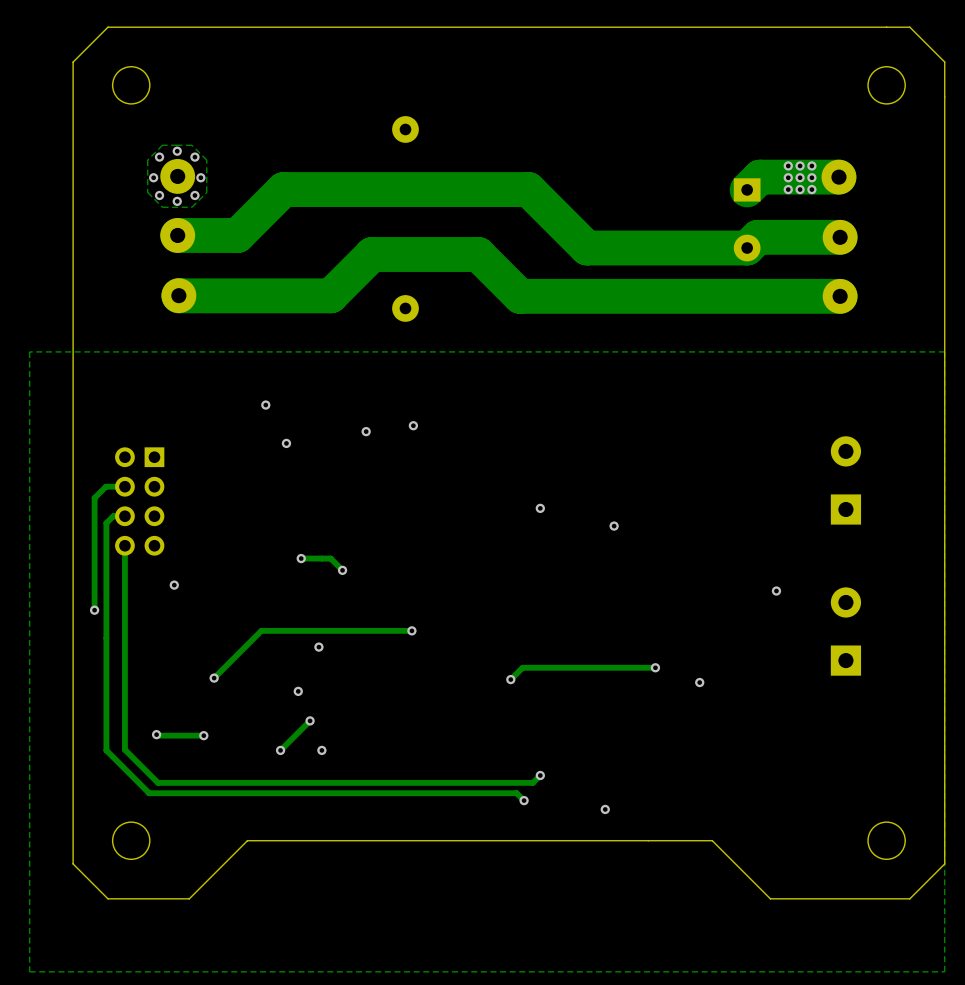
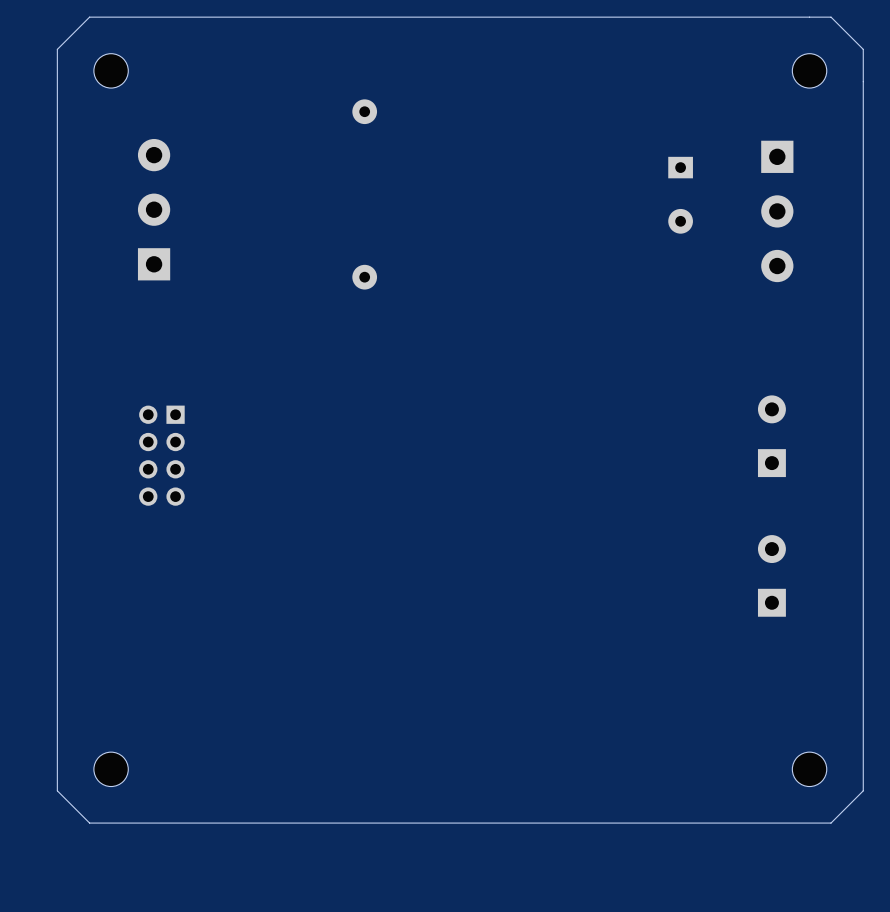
zone outline: (192, 145) (162, 145) (147, 160) (147, 192) (162, 207) (192, 207) (206, 192) (206, 160) (192, 145) -> none
via: (177, 151) -> none
via: (159, 157) -> none
via: (194, 157) -> none
part footprint: [160, 159, 197, 314] -> [137, 139, 171, 281]
via: (788, 165) -> none
via: (800, 165) -> none
via: (811, 165) -> none
via: (153, 177) -> none
via: (200, 177) -> none
via: (788, 177) -> none
via: (800, 177) -> none
via: (811, 177) -> none
track: (838, 177) (759, 177) (747, 189) -> none
via: (788, 189) -> none
via: (800, 189) -> none
via: (811, 189) -> none
via: (159, 195) -> none
via: (194, 195) -> none
via: (177, 201) -> none
track: (177, 235) (237, 235) (283, 189) (528, 189) (586, 248) (747, 248) (757, 237) (840, 237) -> none
part: (839, 236) -> none
part: none -> (777, 211)
track: (179, 295) (330, 295) (372, 254) (478, 254) (520, 296) (840, 296) -> none
zone outline: (944, 351) (944, 971) (29, 971) (29, 351) (944, 351) -> none
via: (265, 405) -> none
via: (413, 425) -> none
via: (366, 431) -> none
via: (286, 443) -> none
track: (124, 486) (105, 486) (94, 498) (94, 610) -> none
part position: (139, 501) -> (161, 455)
via: (540, 508) -> none
track: (124, 516) (113, 516) (106, 523) (106, 750) (149, 793) (516, 793) (524, 800) -> none
via: (614, 526) -> none
track: (124, 545) (124, 749) (158, 782) (532, 782) (540, 775) -> none
track: (301, 558) (330, 558) (342, 570) -> none
via: (301, 558) -> none
via: (342, 570) -> none
via: (174, 585) -> none
via: (776, 591) -> none
via: (94, 610) -> none
track: (411, 630) (261, 630) (214, 678) -> none
via: (411, 630) -> none
via: (318, 647) -> none
track: (655, 667) (522, 667) (510, 679) -> none
via: (655, 667) -> none
via: (214, 678) -> none
via: (510, 679) -> none
via: (699, 682) -> none
via: (298, 691) -> none
track: (310, 720) (280, 750) -> none
via: (310, 720) -> none
track: (156, 734) (203, 735) -> none
via: (156, 734) -> none
via: (203, 735) -> none
via: (280, 750) -> none
via: (321, 750) -> none
via: (540, 775) -> none
via: (524, 800) -> none
via: (605, 809) -> none
board edge: (770, 898) (712, 840) (247, 840) (189, 898) -> (702, 823) (164, 823)

